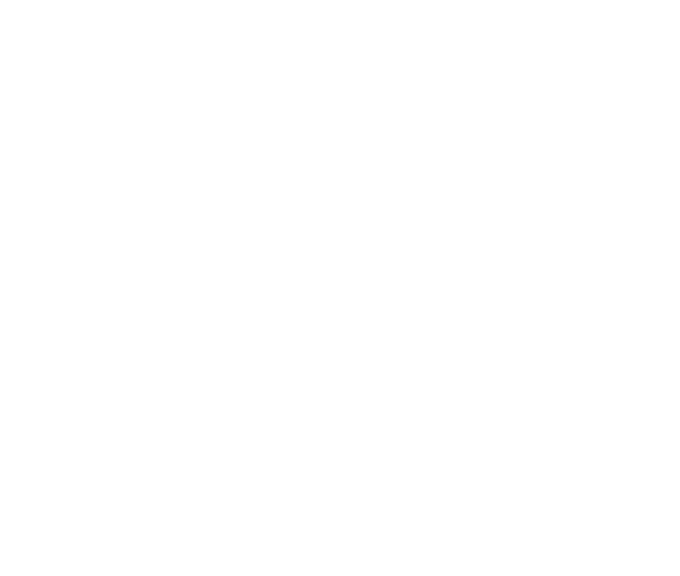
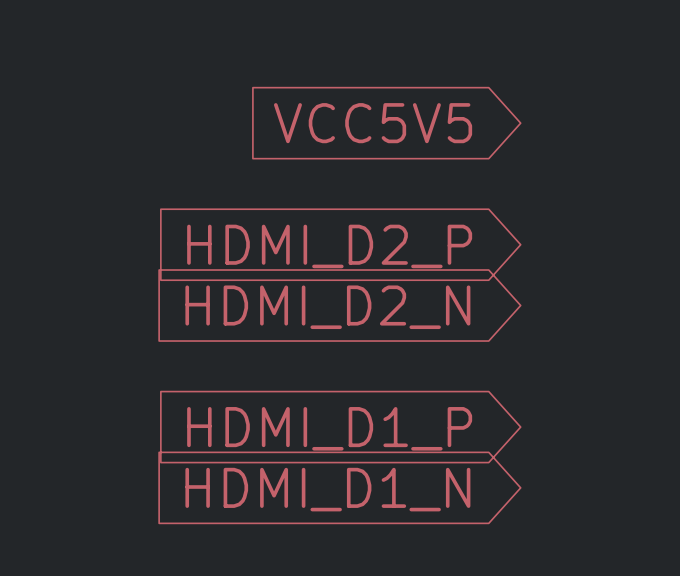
global label: none -> VCC5V5 (373, 123)
global label: none -> HDMI_D2_P (329, 246)
global label: none -> HDMI_D2_N (327, 307)
global label: none -> HDMI_D1_P (329, 428)
global label: none -> HDMI_D1_N (327, 489)

